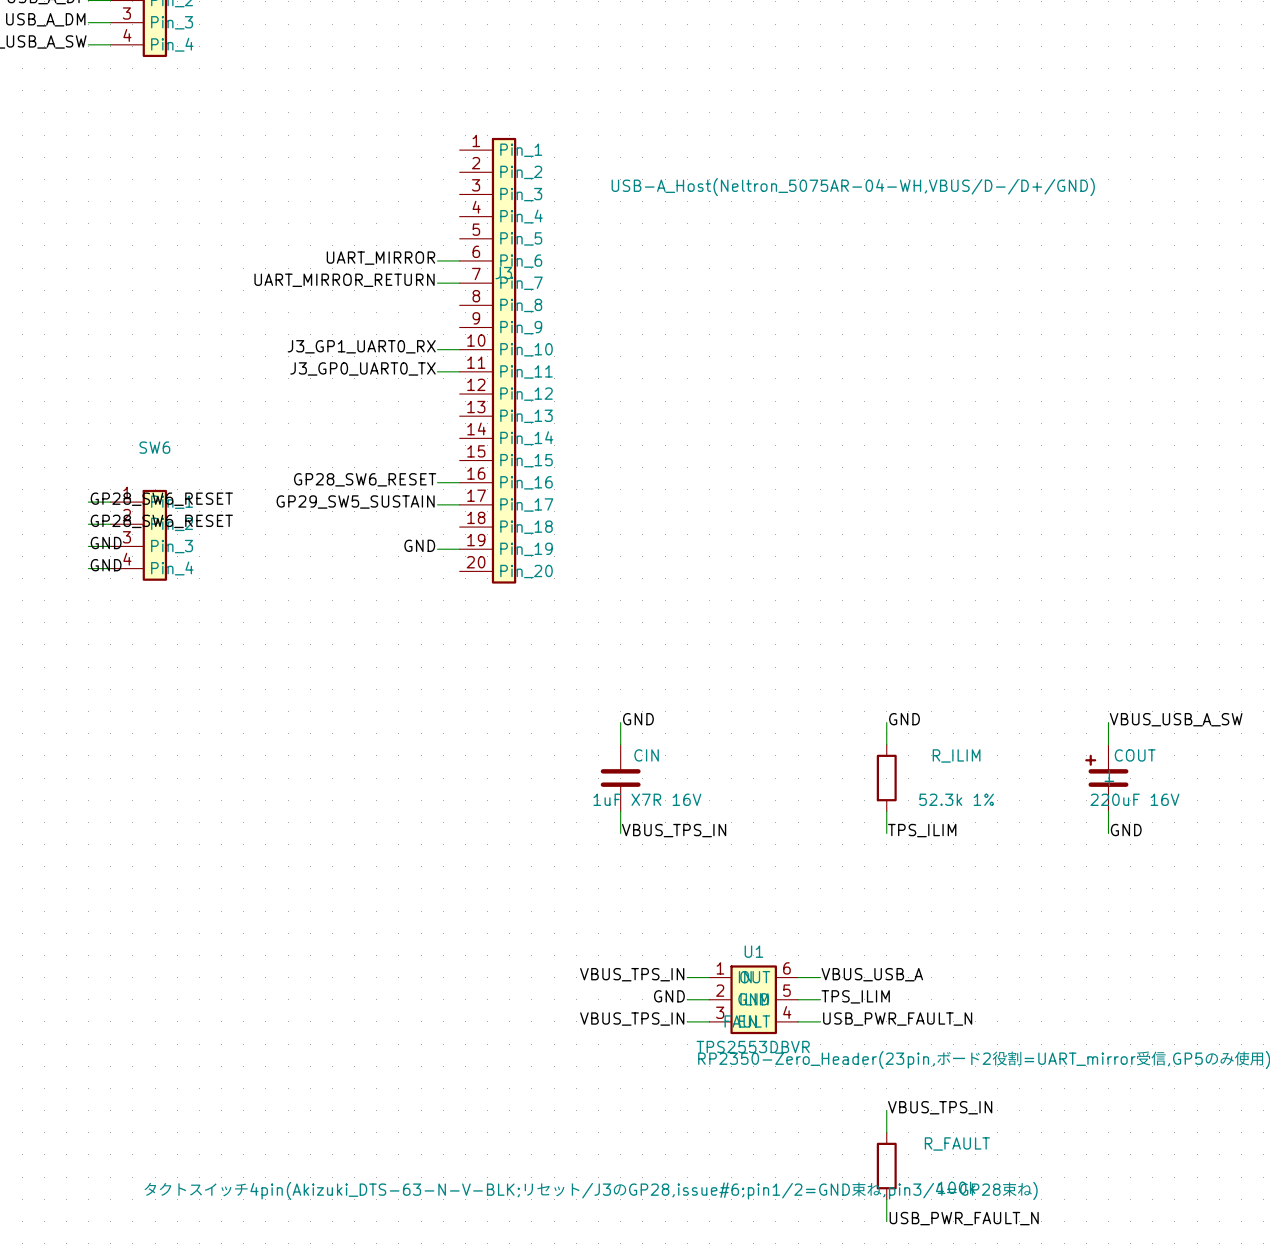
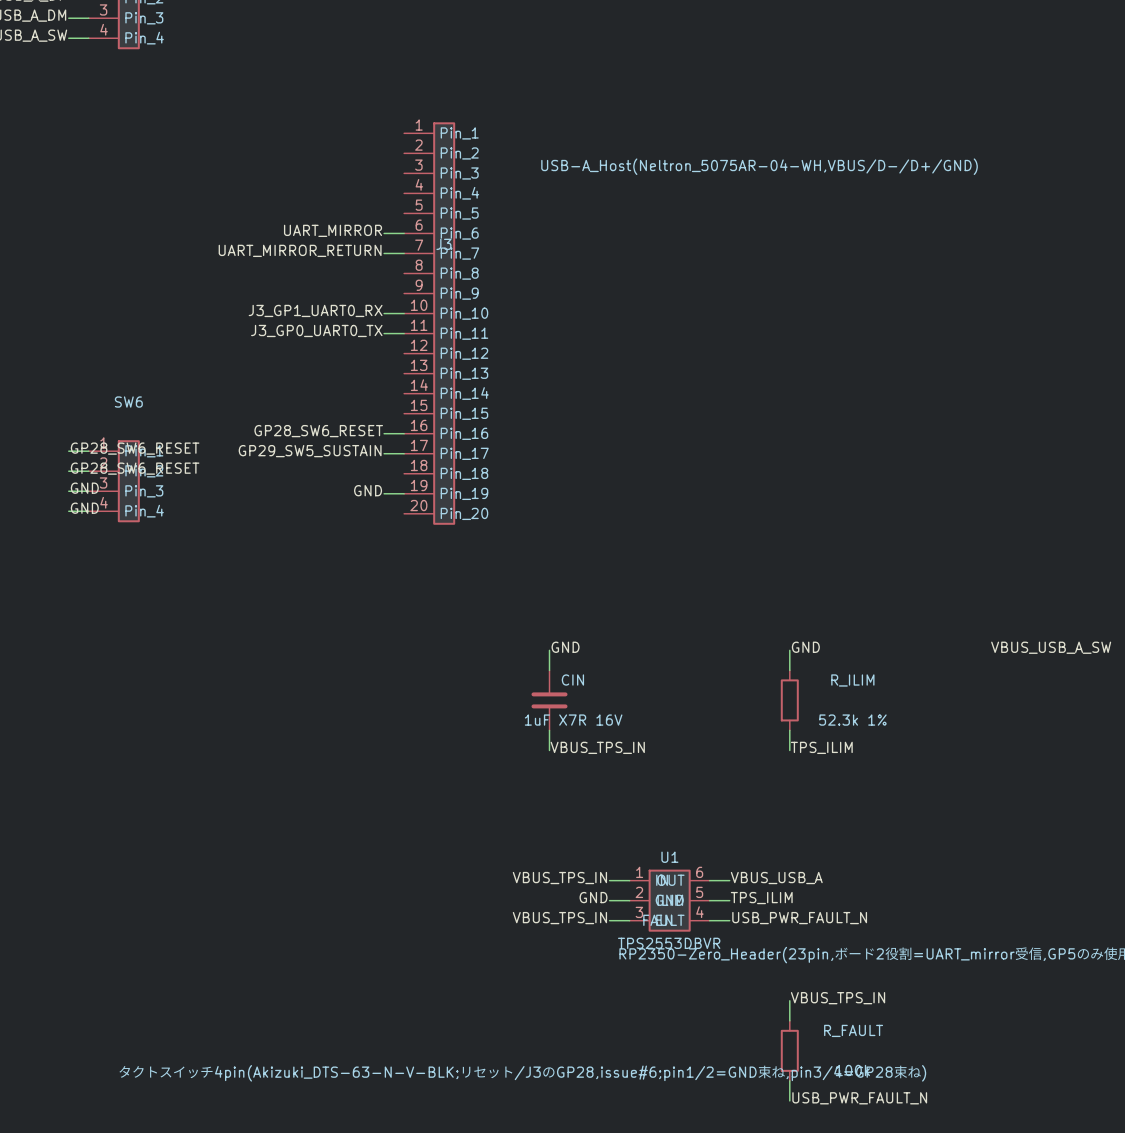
wire: (1108, 722) (1108, 744) -> none
COUT: 220uF 16V (1106, 778) -> none
wire: (1108, 811) (1108, 833) -> none
label: GND (1126, 830) -> none

